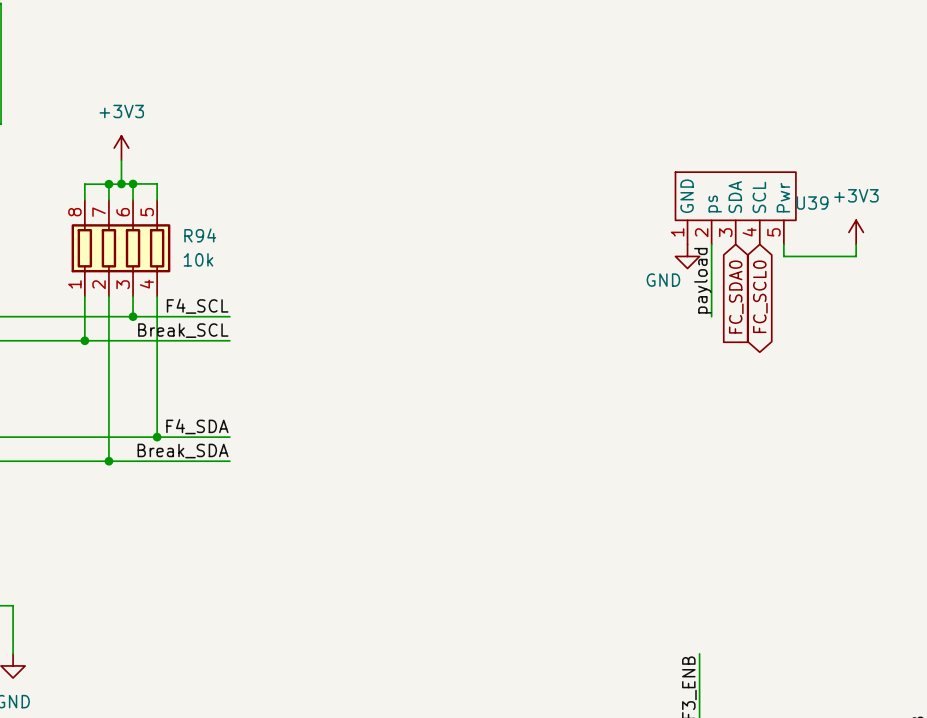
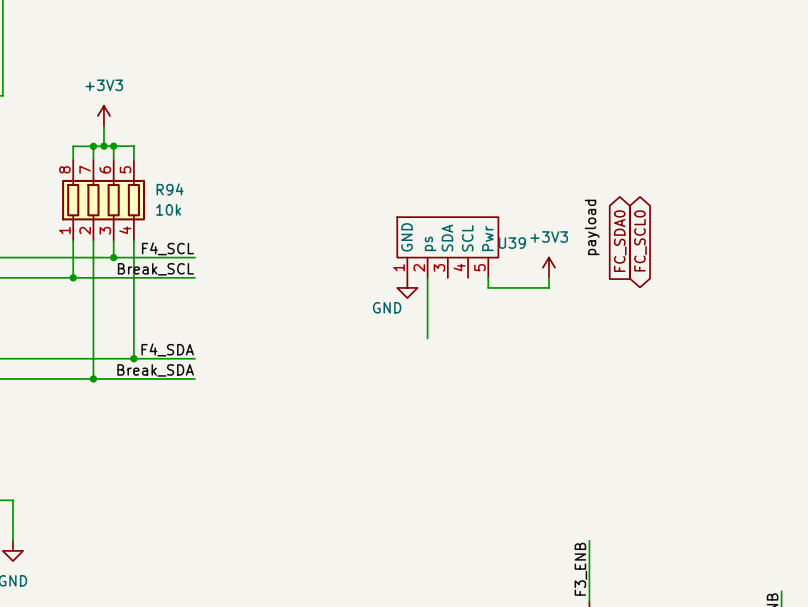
U39 position: (735, 208) -> (447, 247)
power symbol position: +3V3 (856, 232) -> +3V3 (548, 267)
wire: (711, 244) (711, 316) -> (427, 277) (427, 338)
wire: (783, 244) (783, 256) (856, 256) (856, 244) -> (488, 277) (488, 287) (548, 287) (548, 277)
power symbol position: GND (687, 256) -> GND (407, 287)

